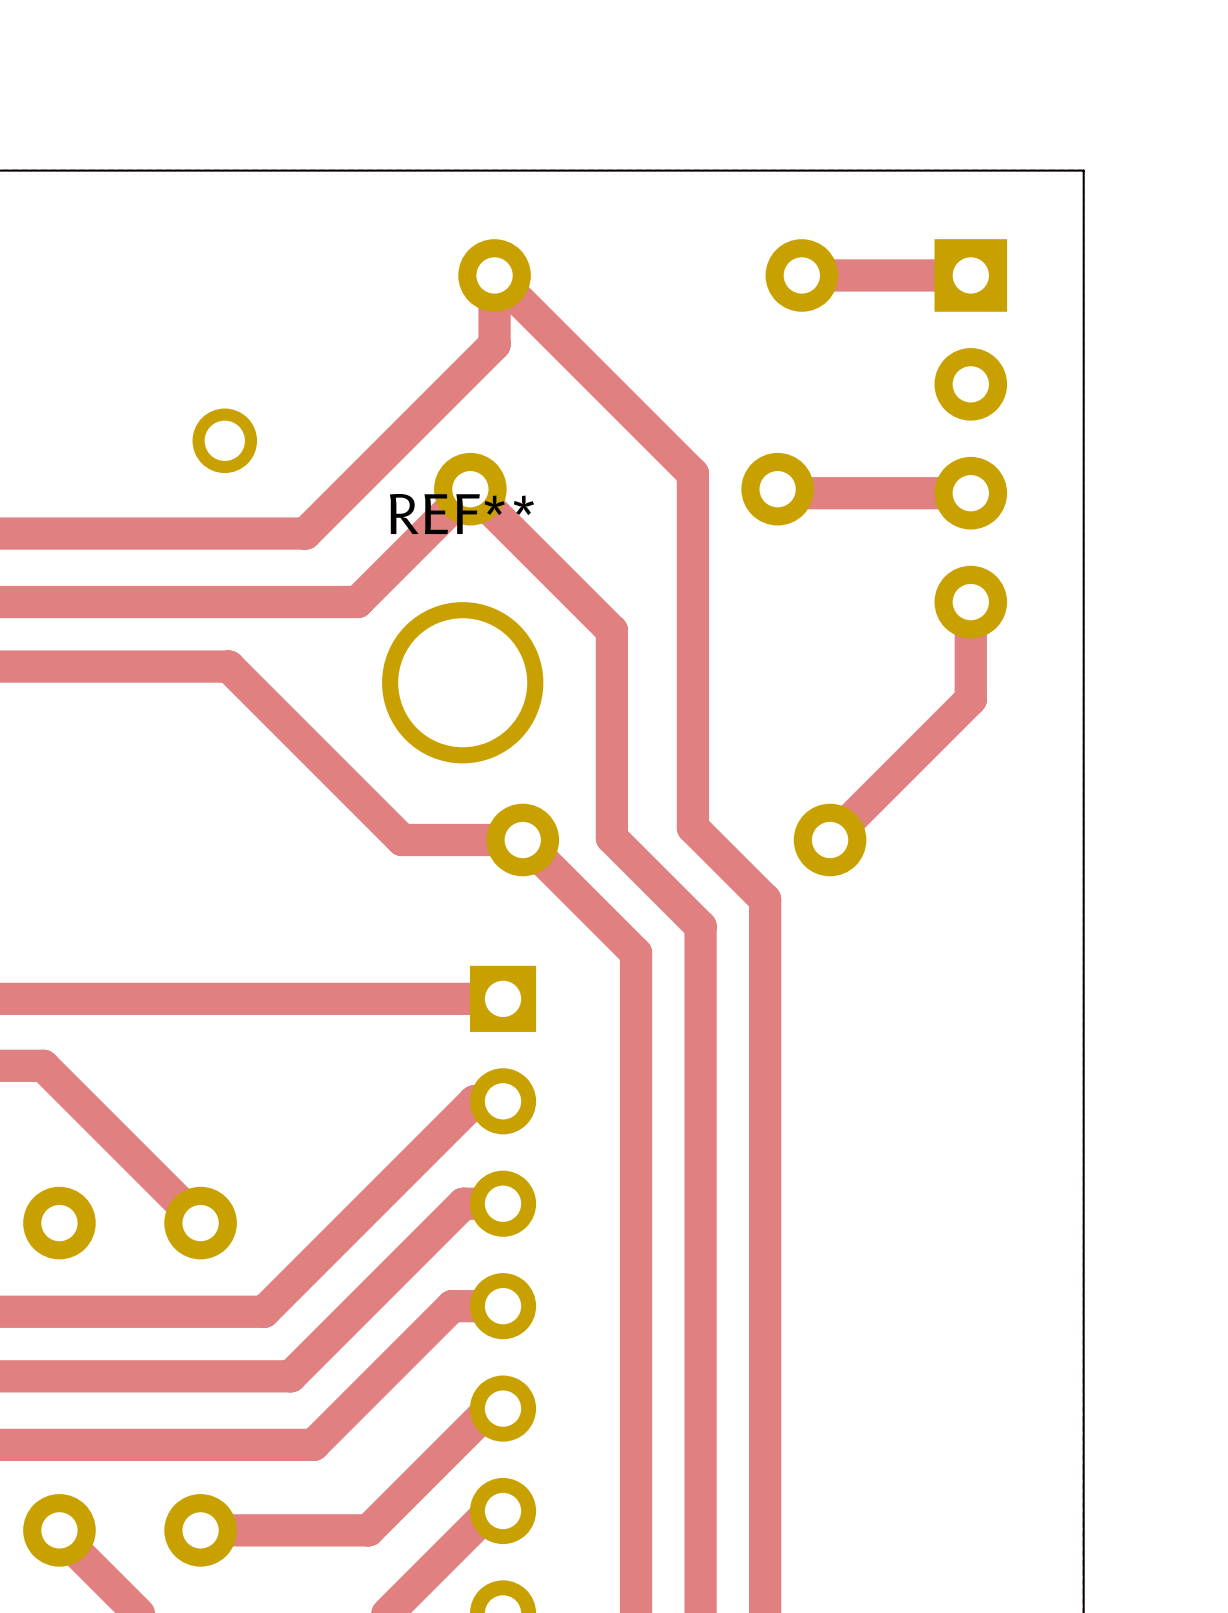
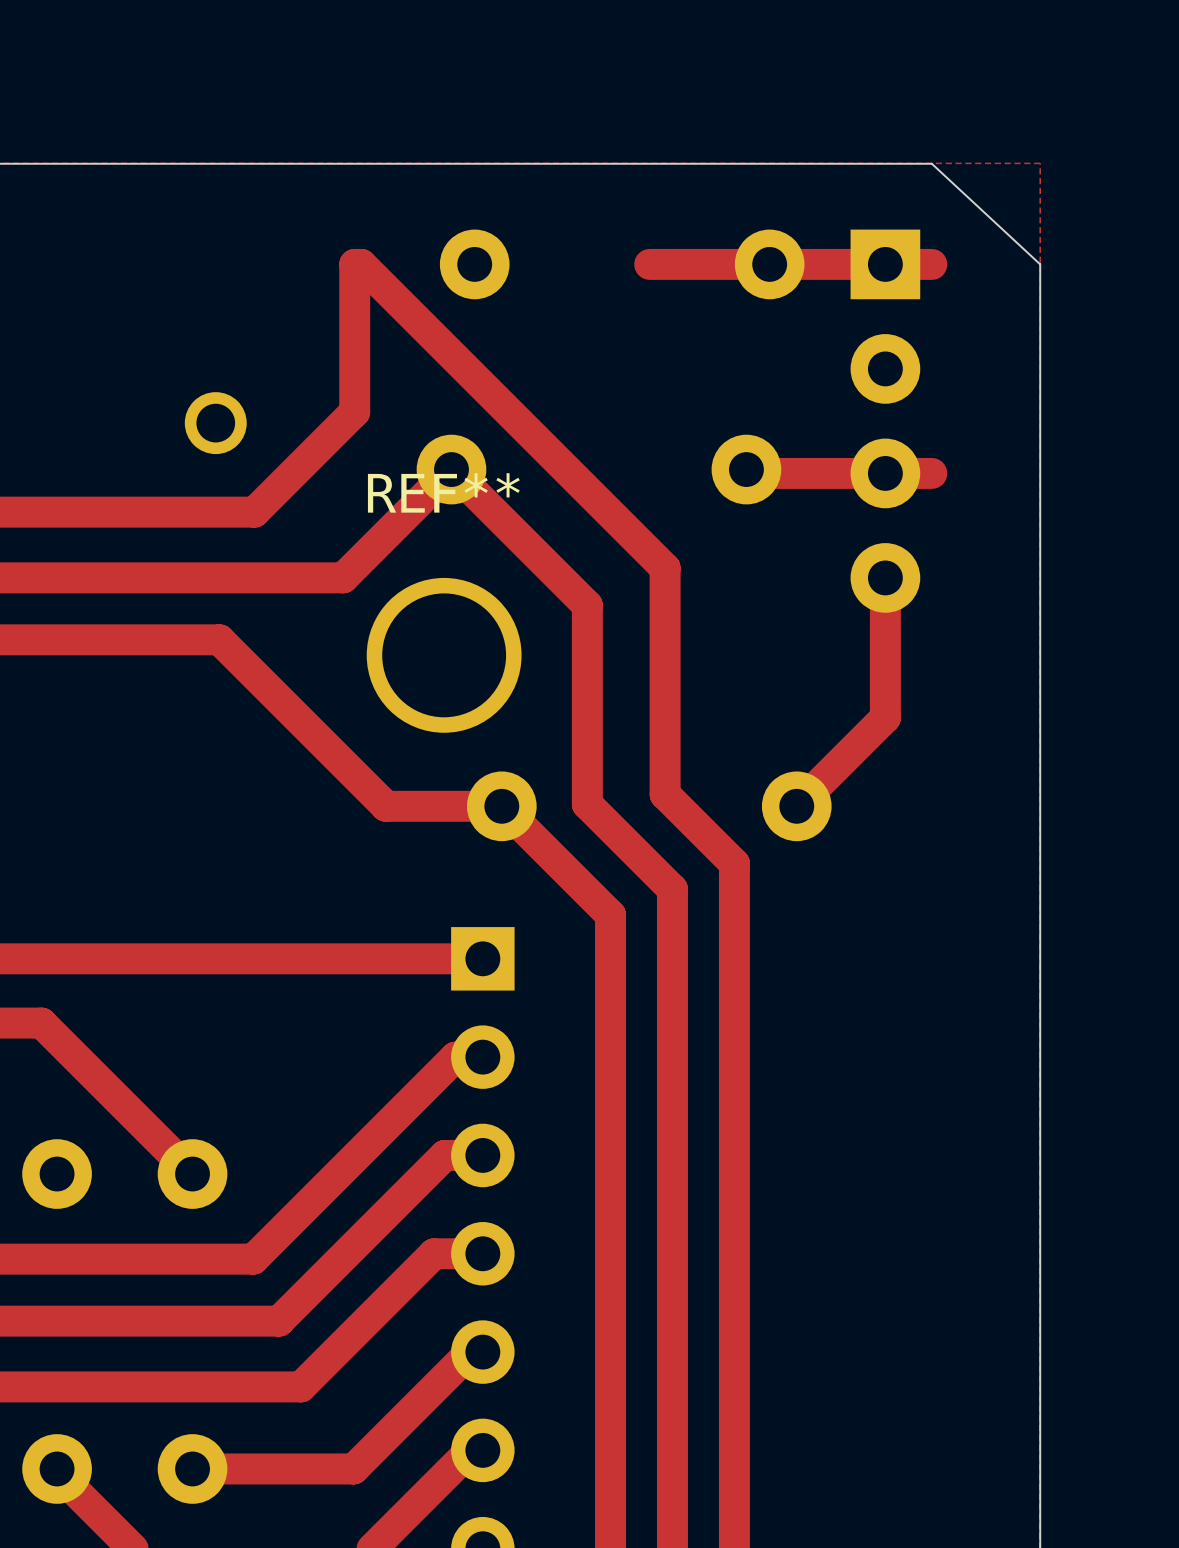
board edge: (970, 170) (1083, 170) (1083, 275) -> (931, 163) (1040, 264)
top track: none -> (649, 264) (769, 264)
part position: (970, 438) -> (885, 421)
top track: (265, 533) (305, 533) (494, 344) (494, 275) (692, 473) (692, 591) -> (254, 512) (354, 411) (354, 264) (361, 264) (665, 568)
top track: (970, 602) (970, 699) (922, 747) -> (885, 577) (885, 717)

